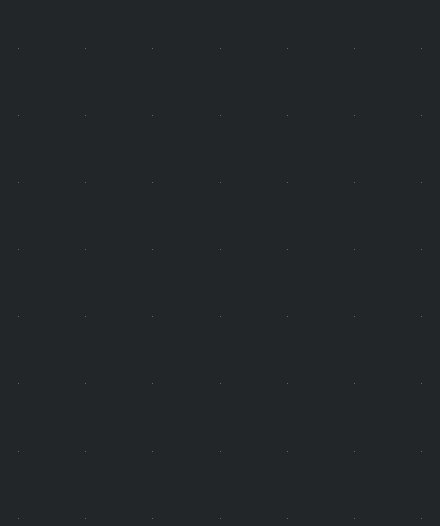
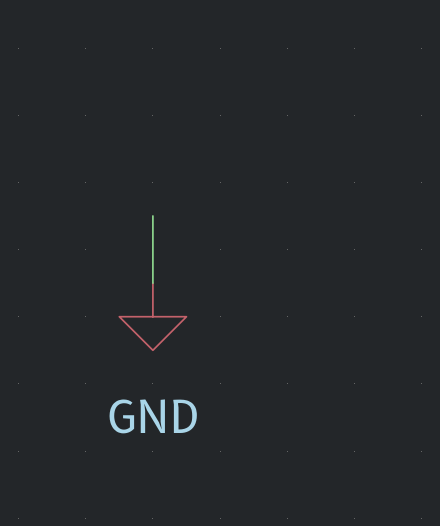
wire: none -> (152, 215) (152, 283)
power symbol: none -> GND (152, 316)

